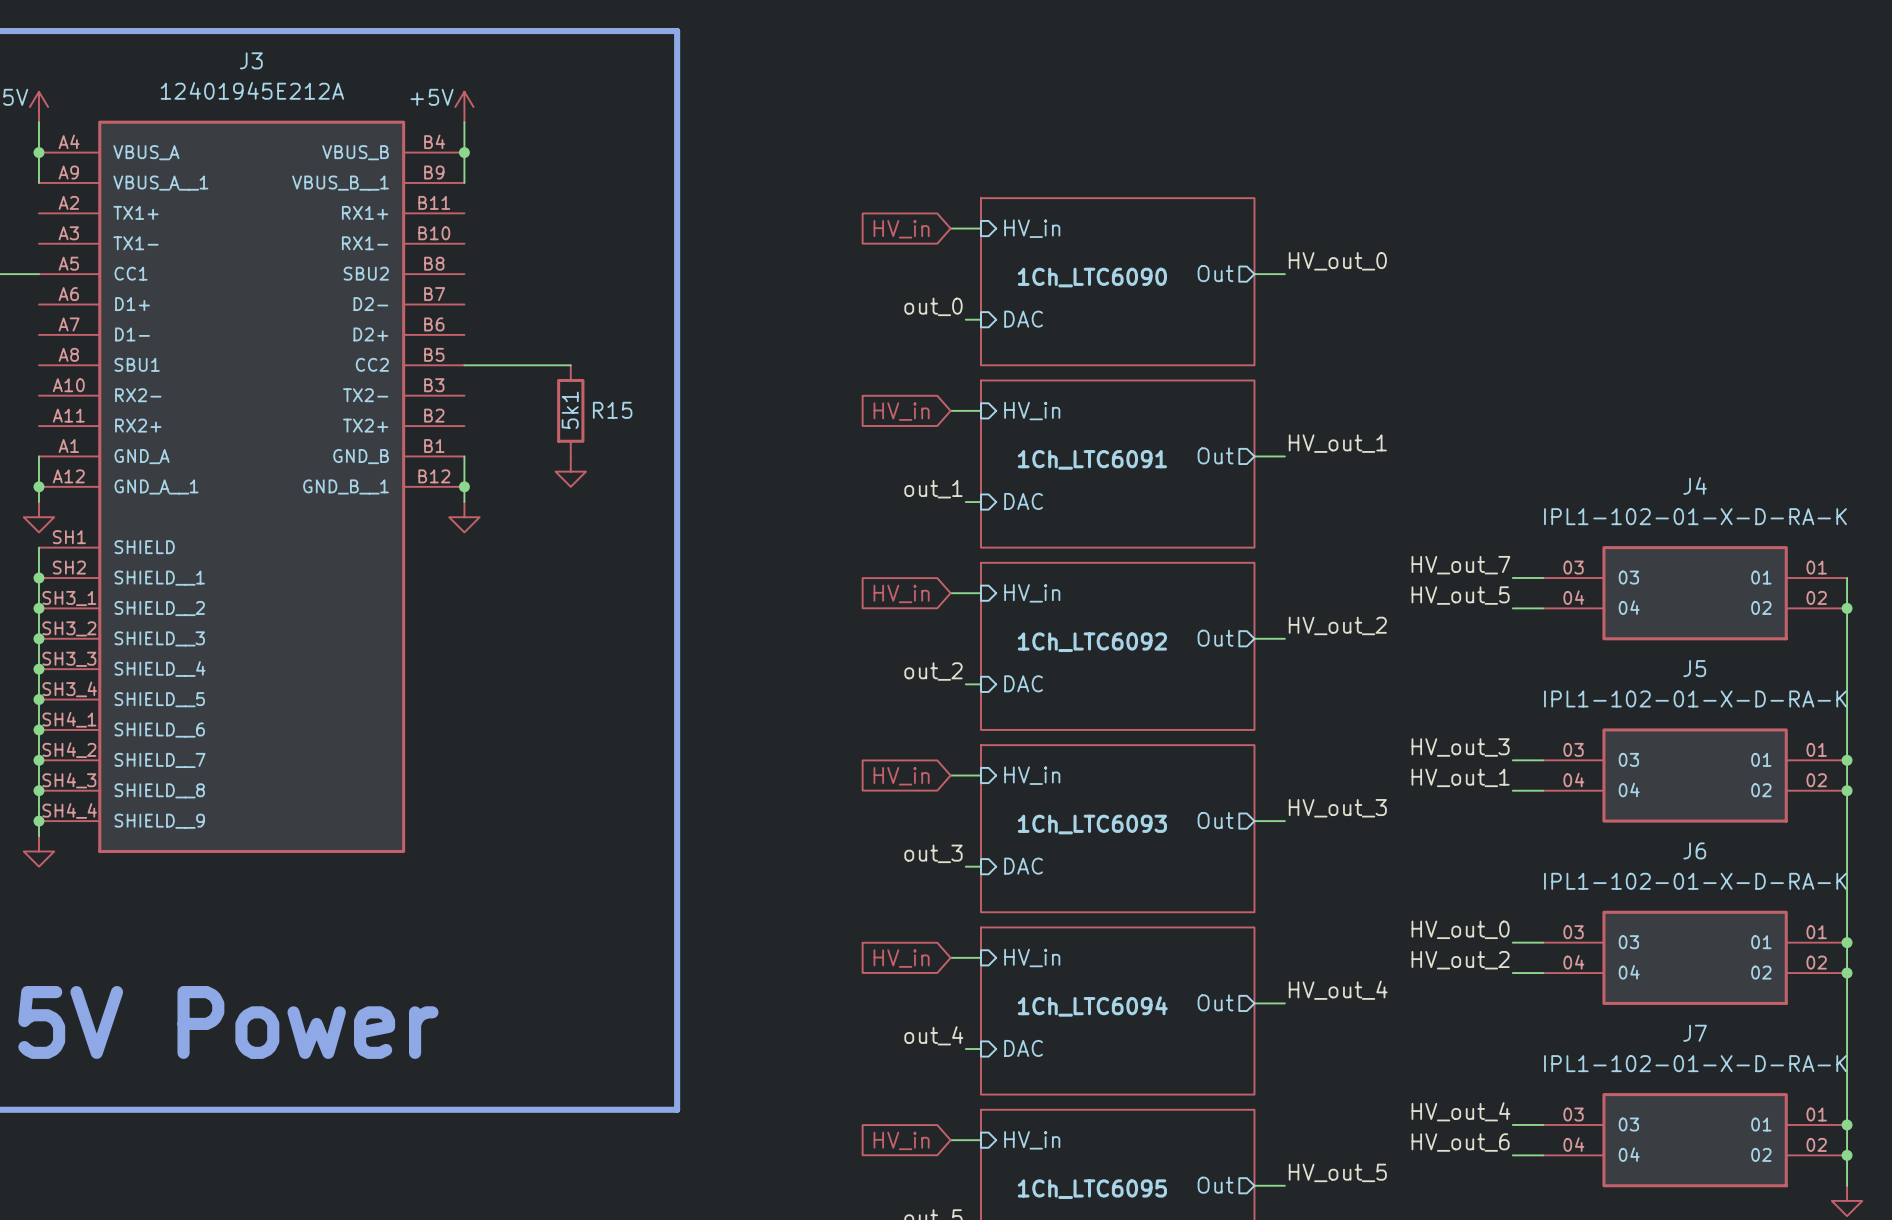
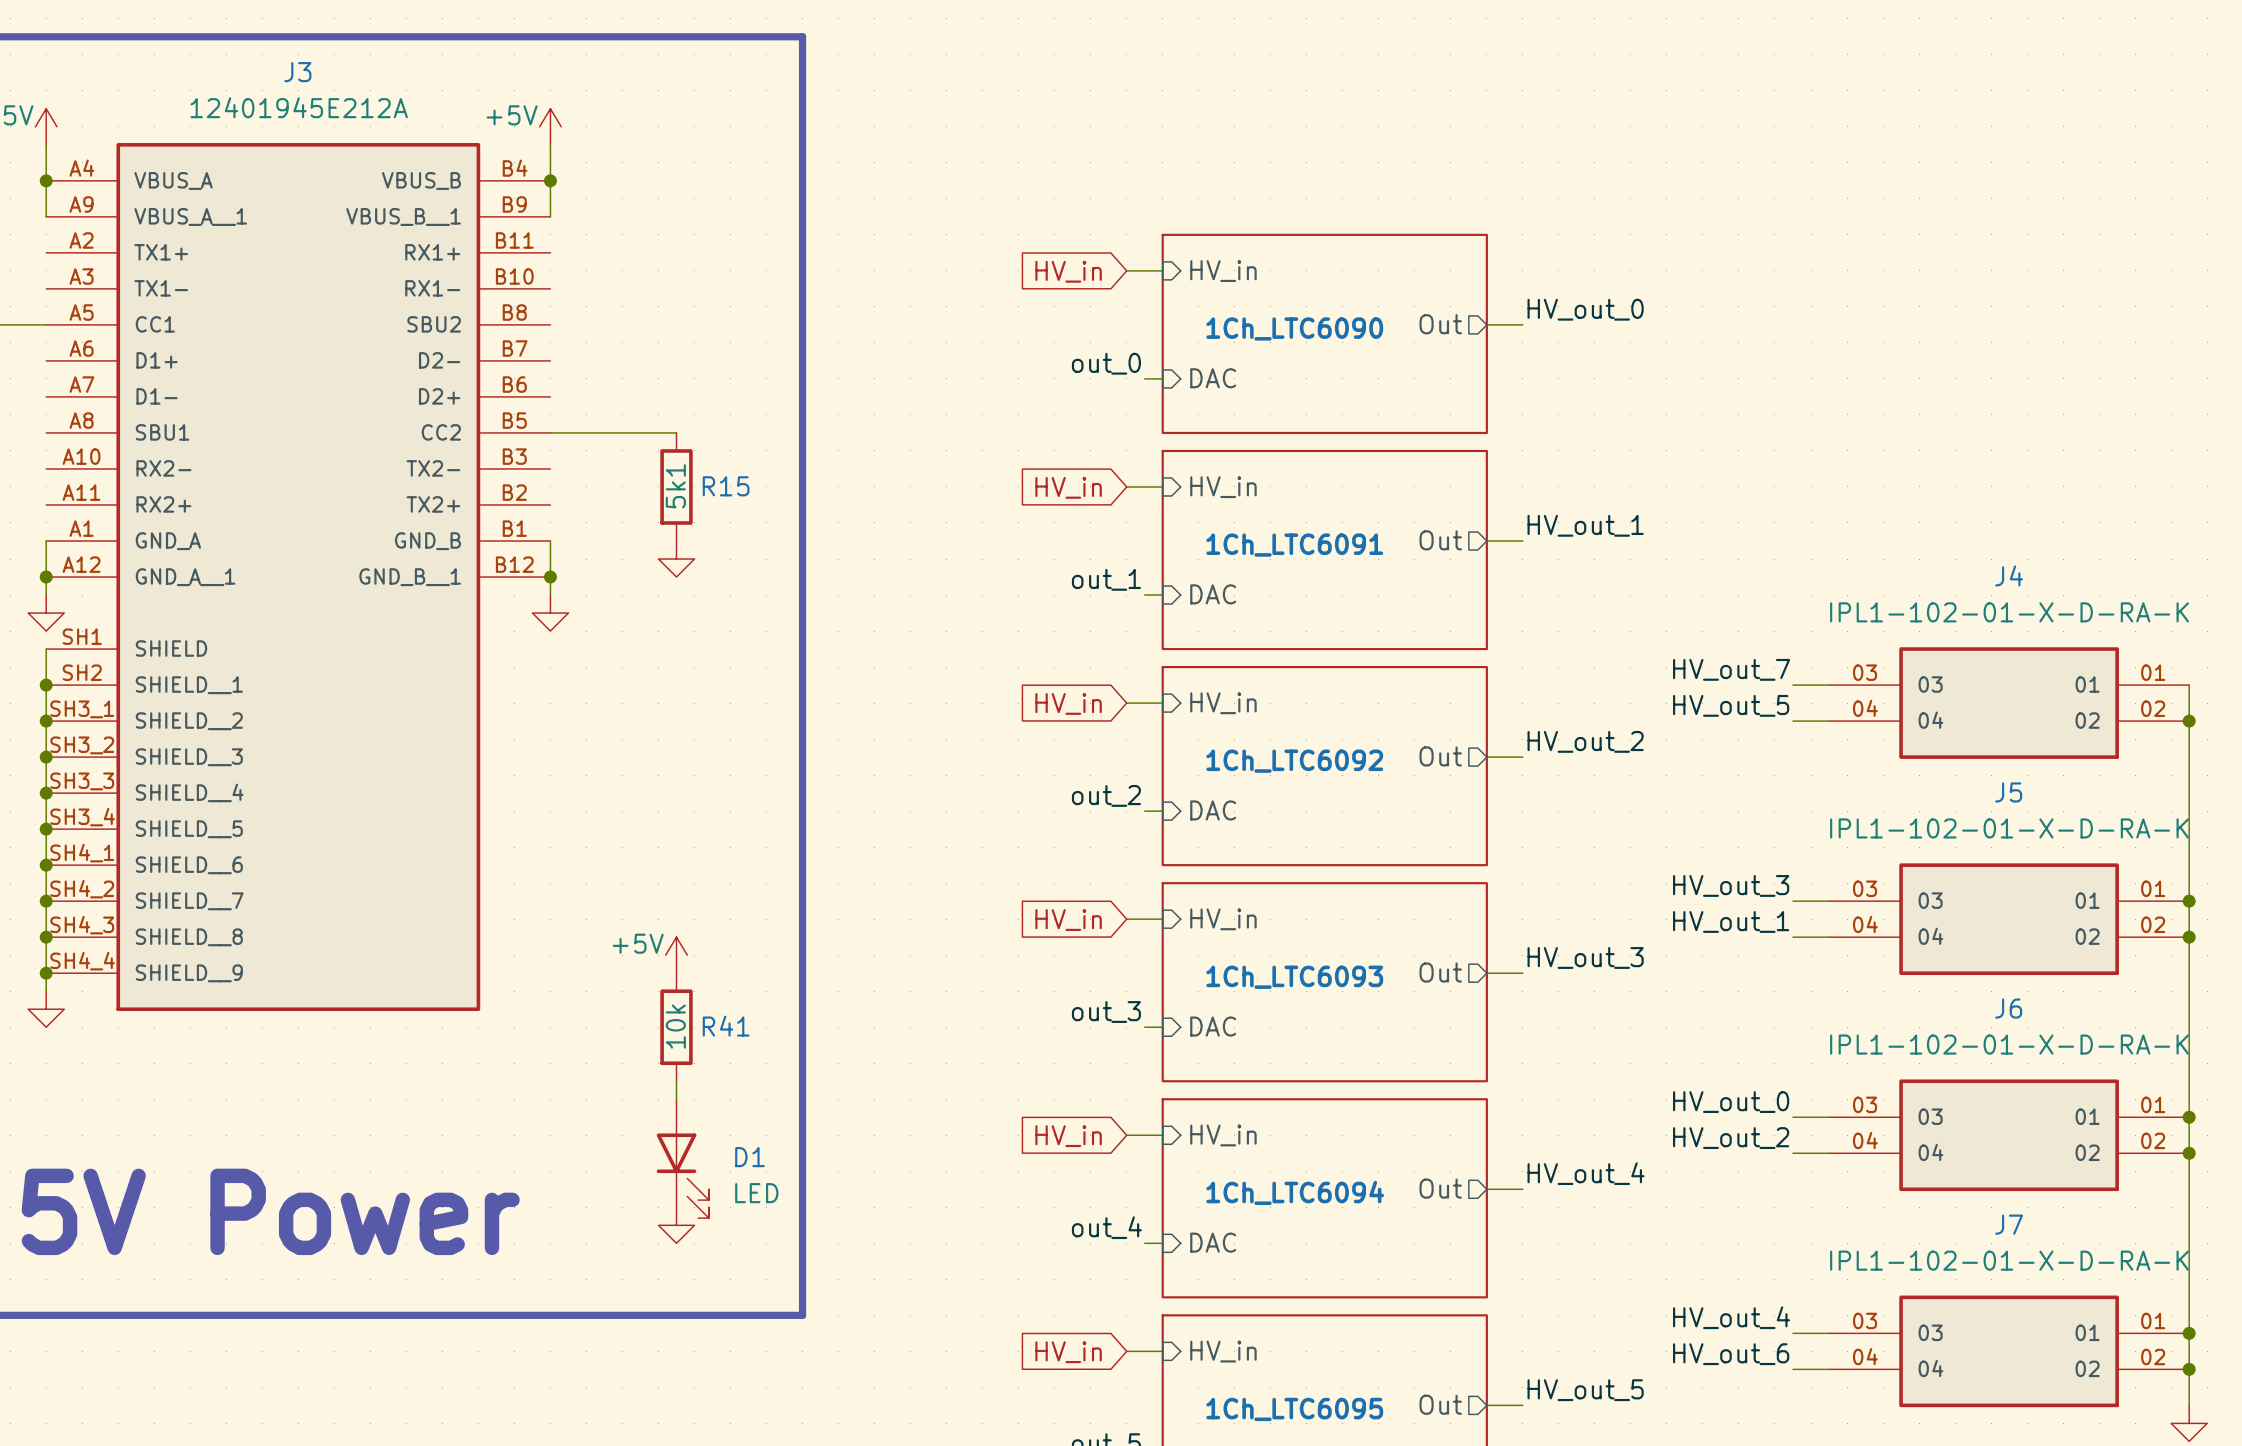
power symbol: none -> +5V (676, 955)
R41: none -> 10k (676, 1027)
wire: none -> (676, 1081) (676, 1099)
D1: none -> LED (682, 1158)
power symbol: none -> (676, 1225)

